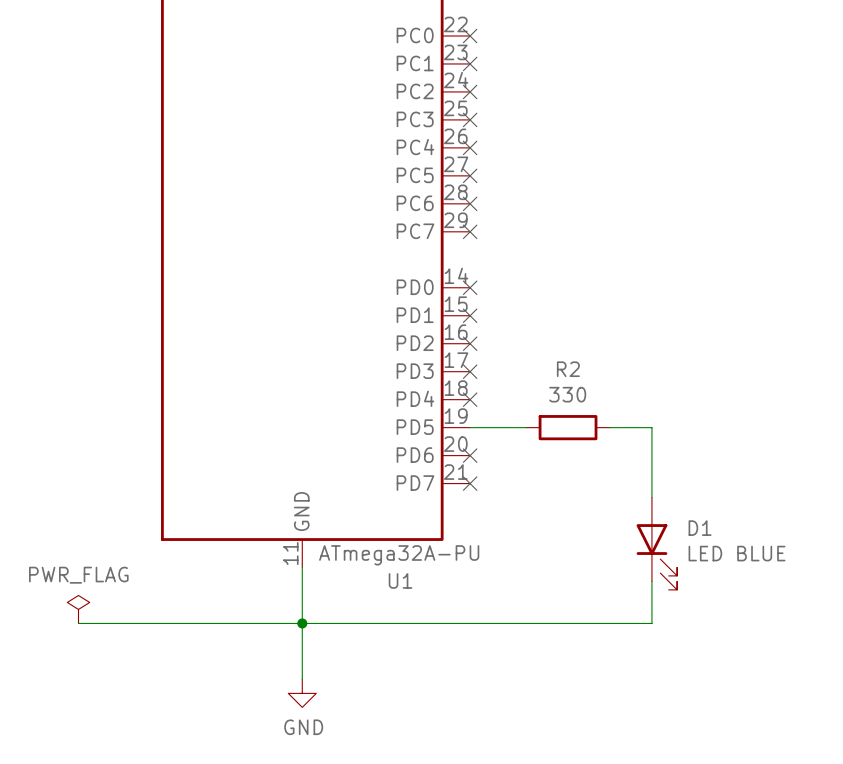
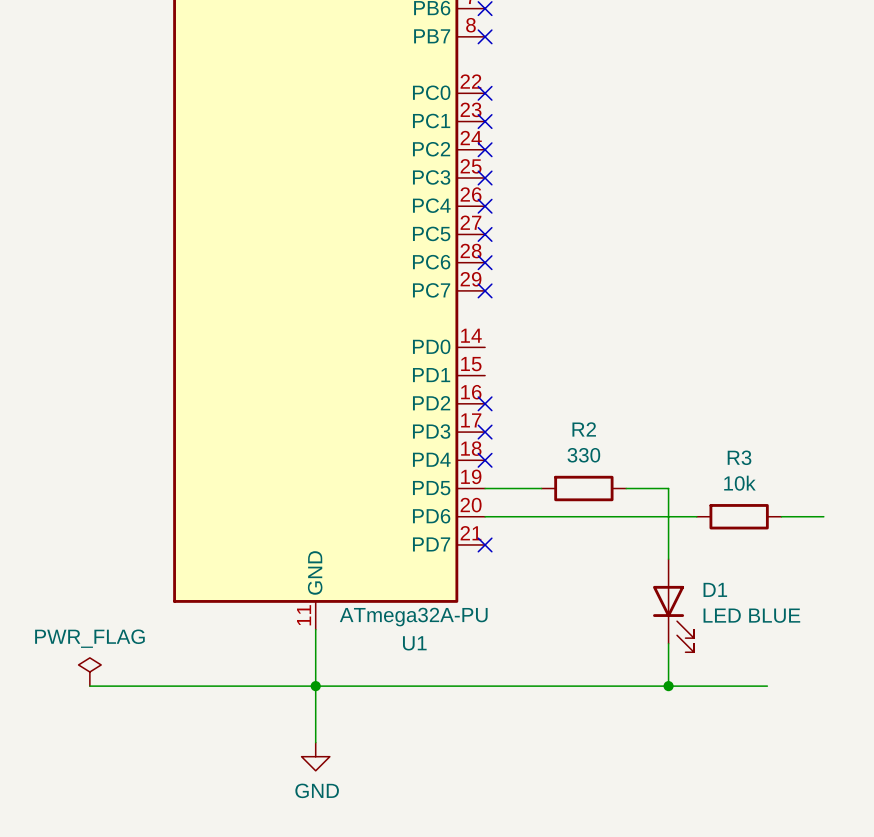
no-connect mark: (470, 287) -> none
no-connect mark: (470, 315) -> none
wire: none -> (485, 516) (696, 516)
no-connect mark: (470, 455) -> none
R3: none -> 10k (739, 516)
wire: none -> (781, 516) (823, 516)
wire: none -> (668, 686) (767, 686)
junction: none -> (668, 686)

